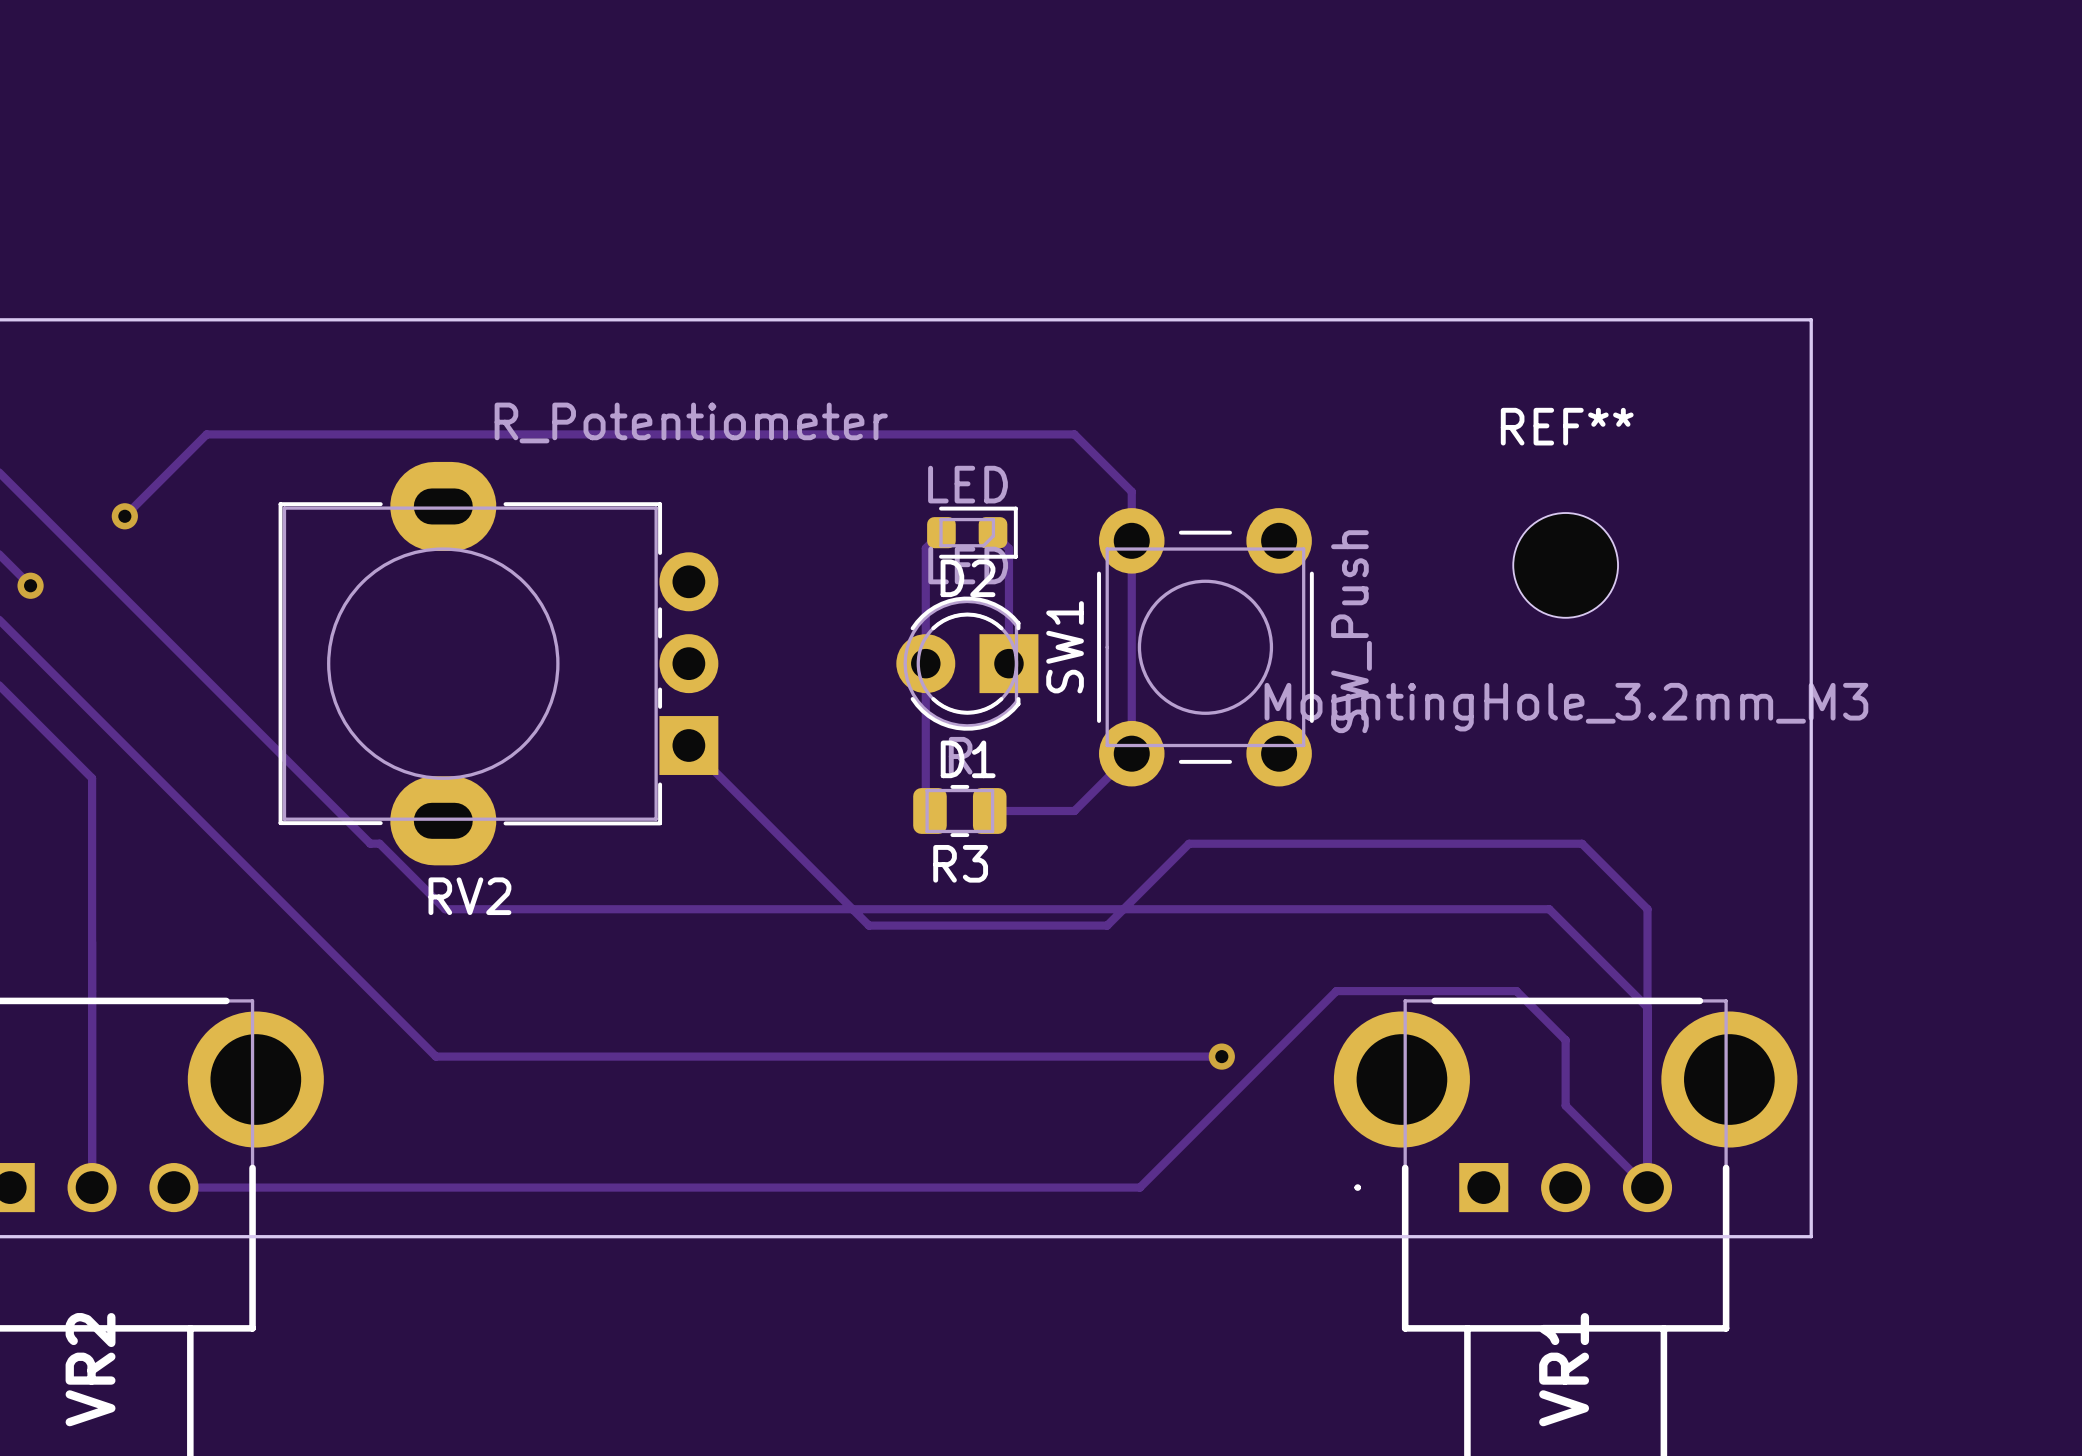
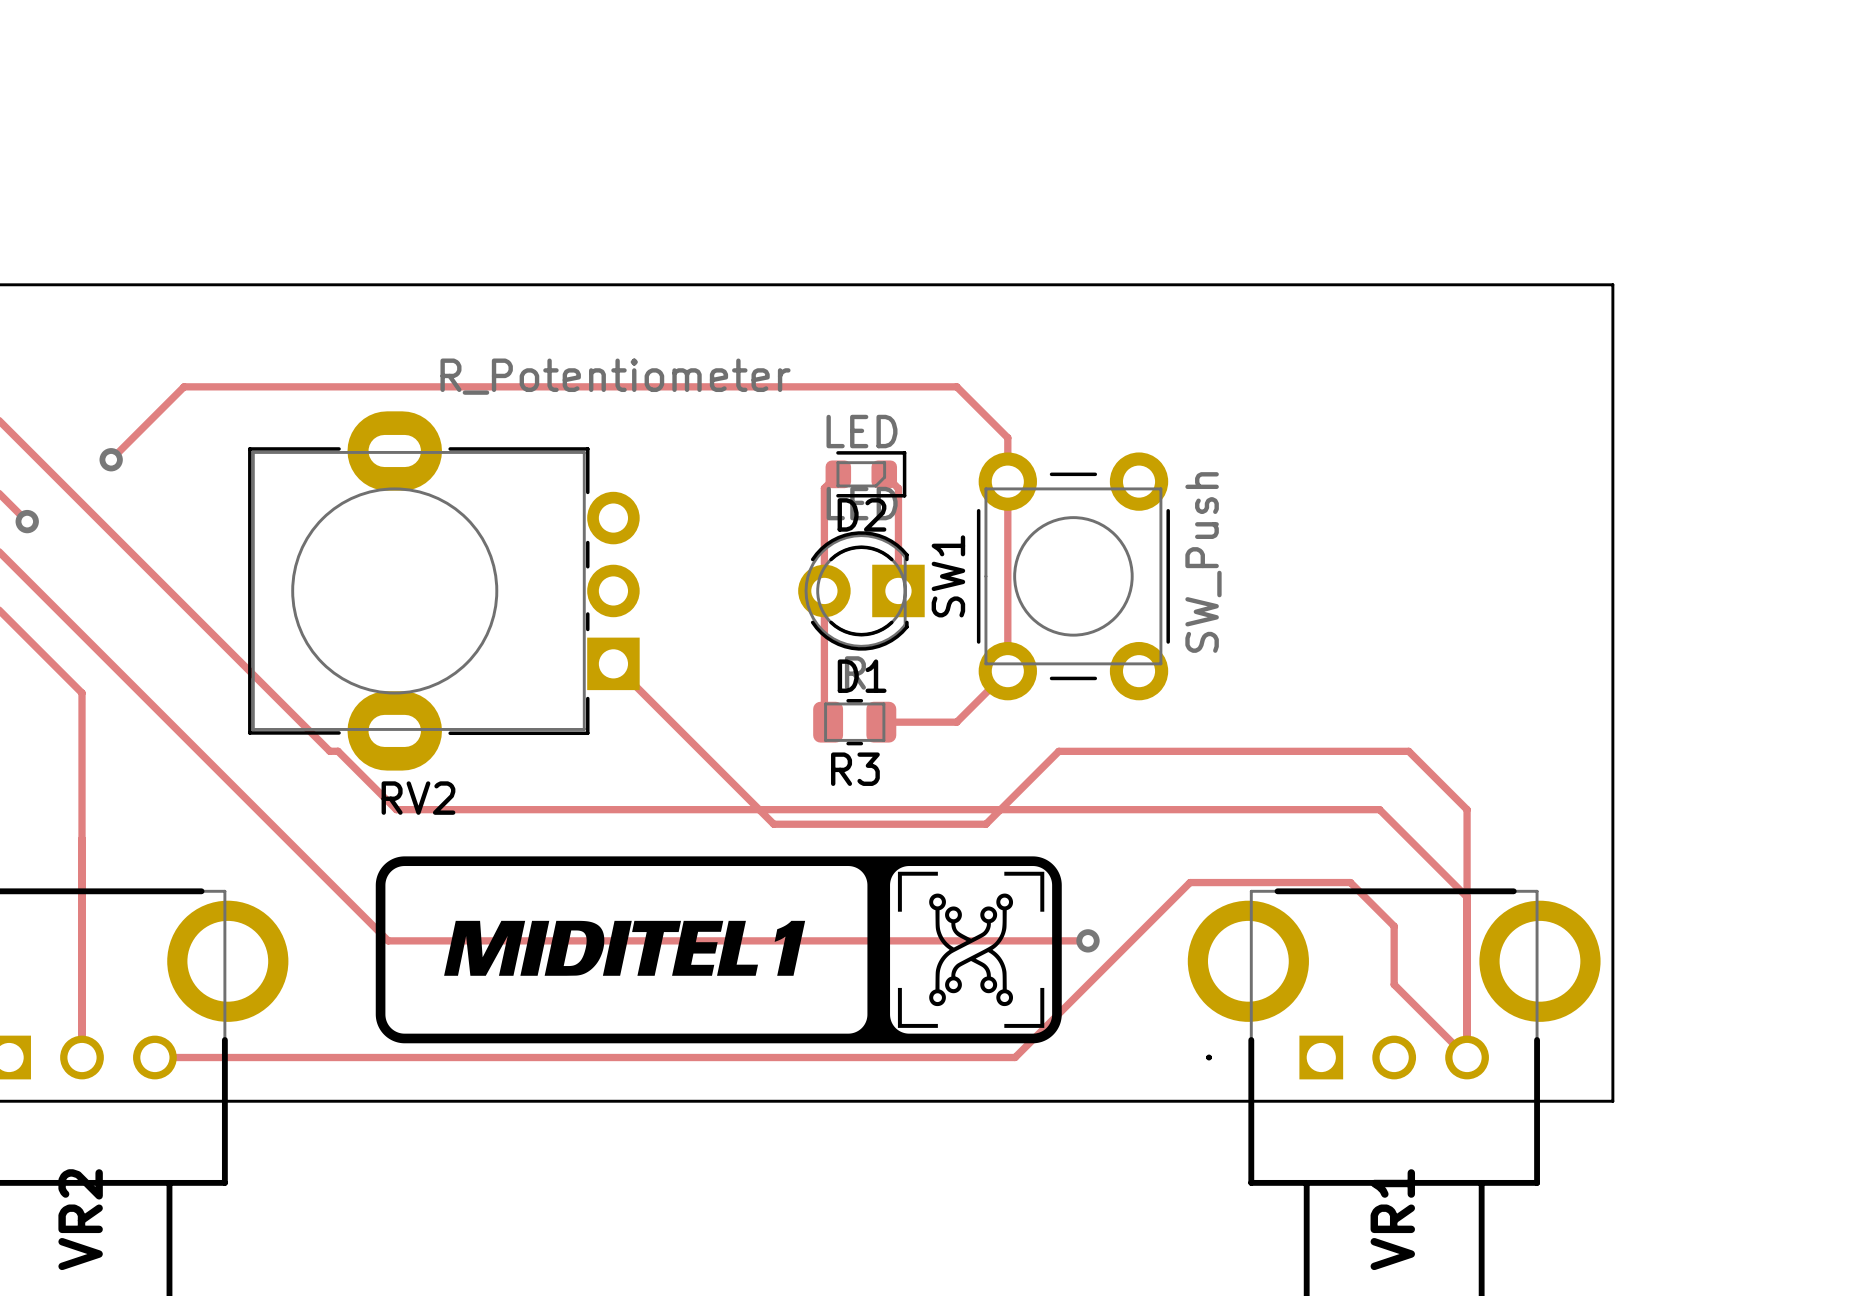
REF**: MountingHole_3.2mm_M3 (1565, 565) -> none
drawing: none -> [375, 856, 1062, 1044]

